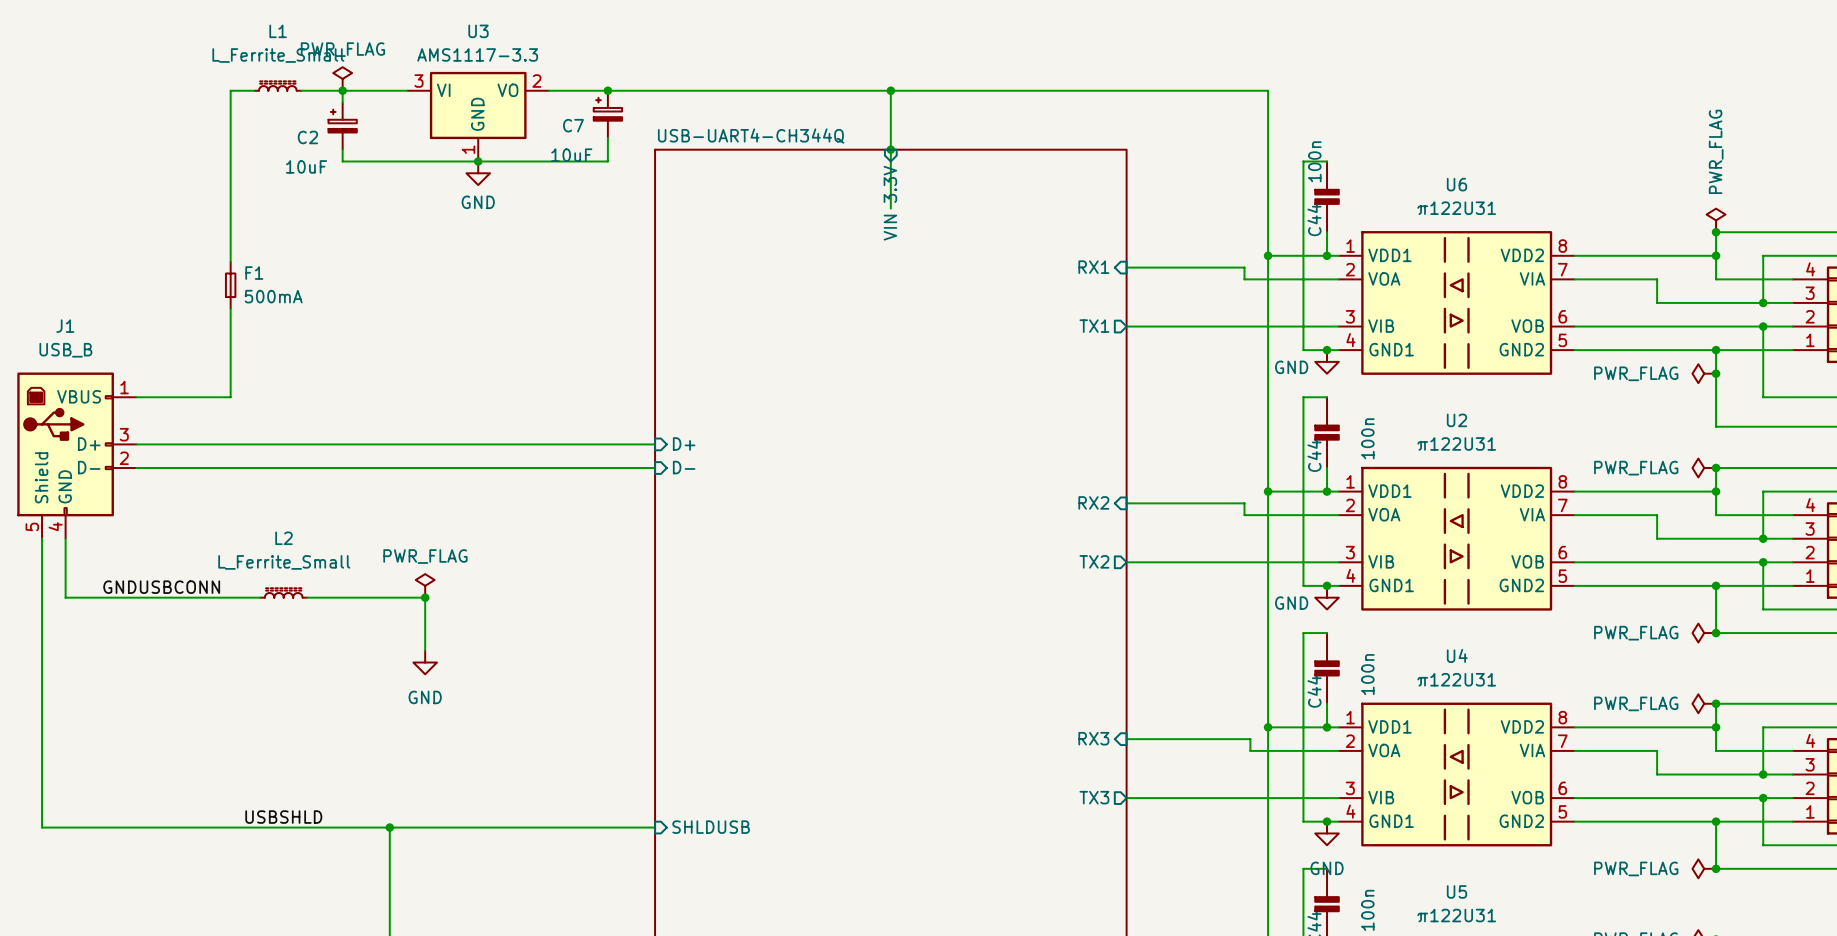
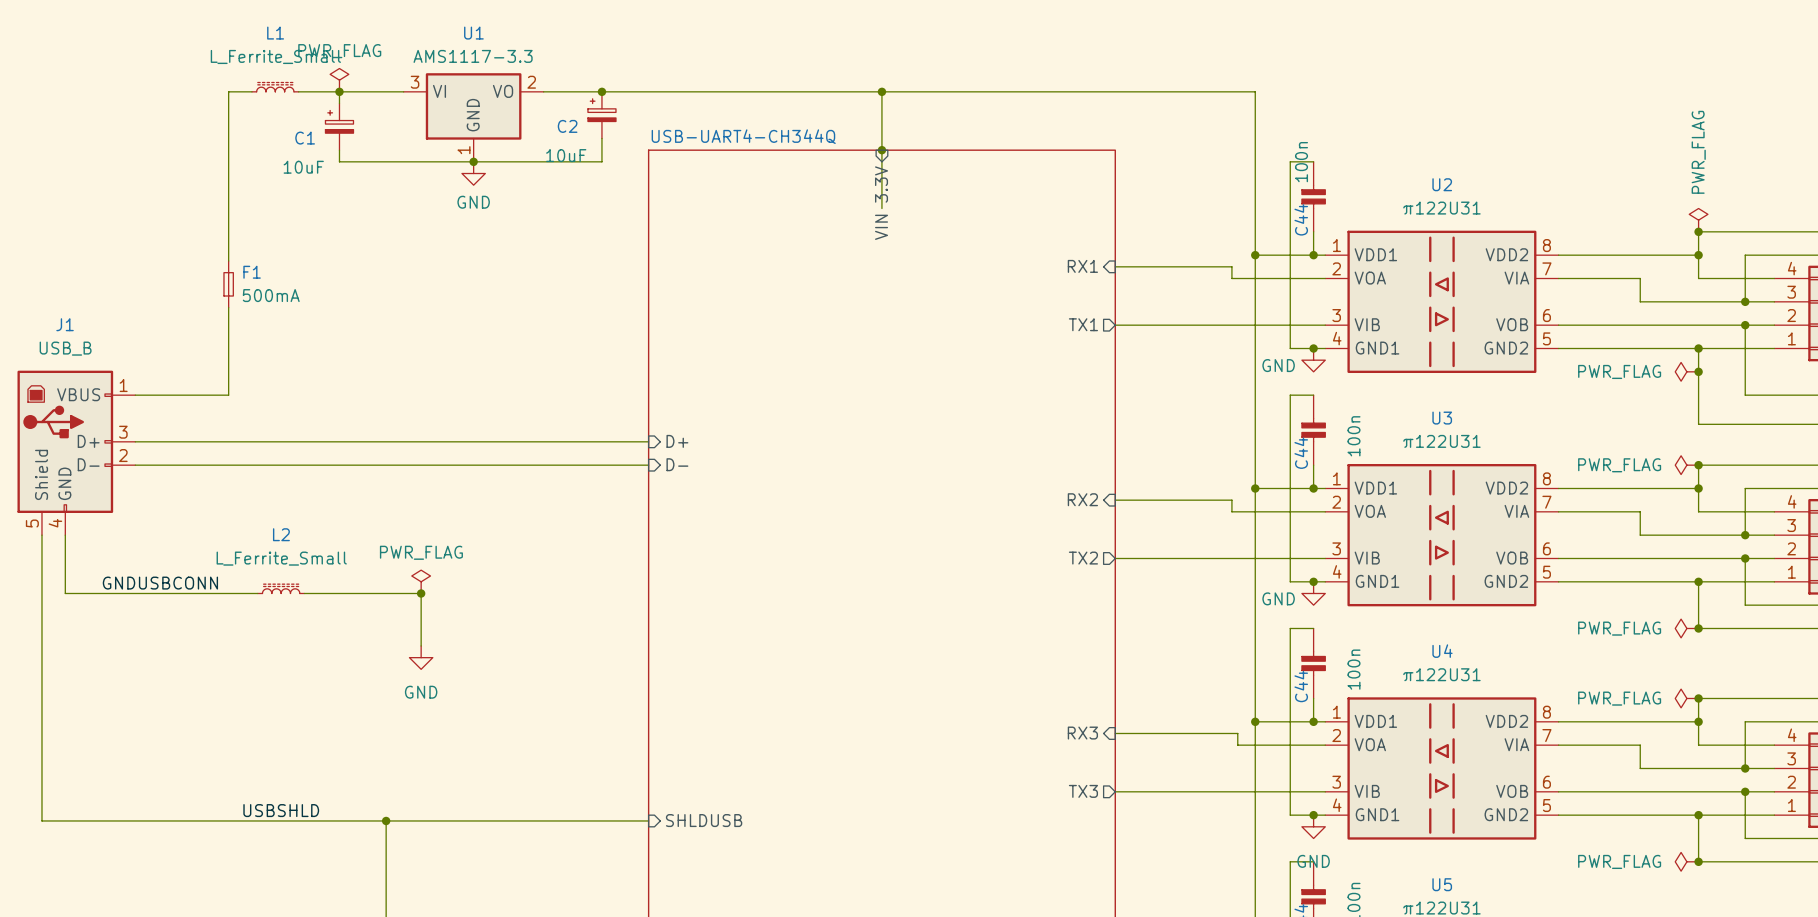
U3 name: U3 (478, 31) -> U1 (473, 33)
C7 name: C7 (573, 125) -> C2 (567, 126)
C2 name: C2 (307, 137) -> C1 (305, 138)
U6 name: U6 (1456, 184) -> U2 (1442, 184)
U2 name: U2 (1456, 420) -> U3 (1442, 418)

